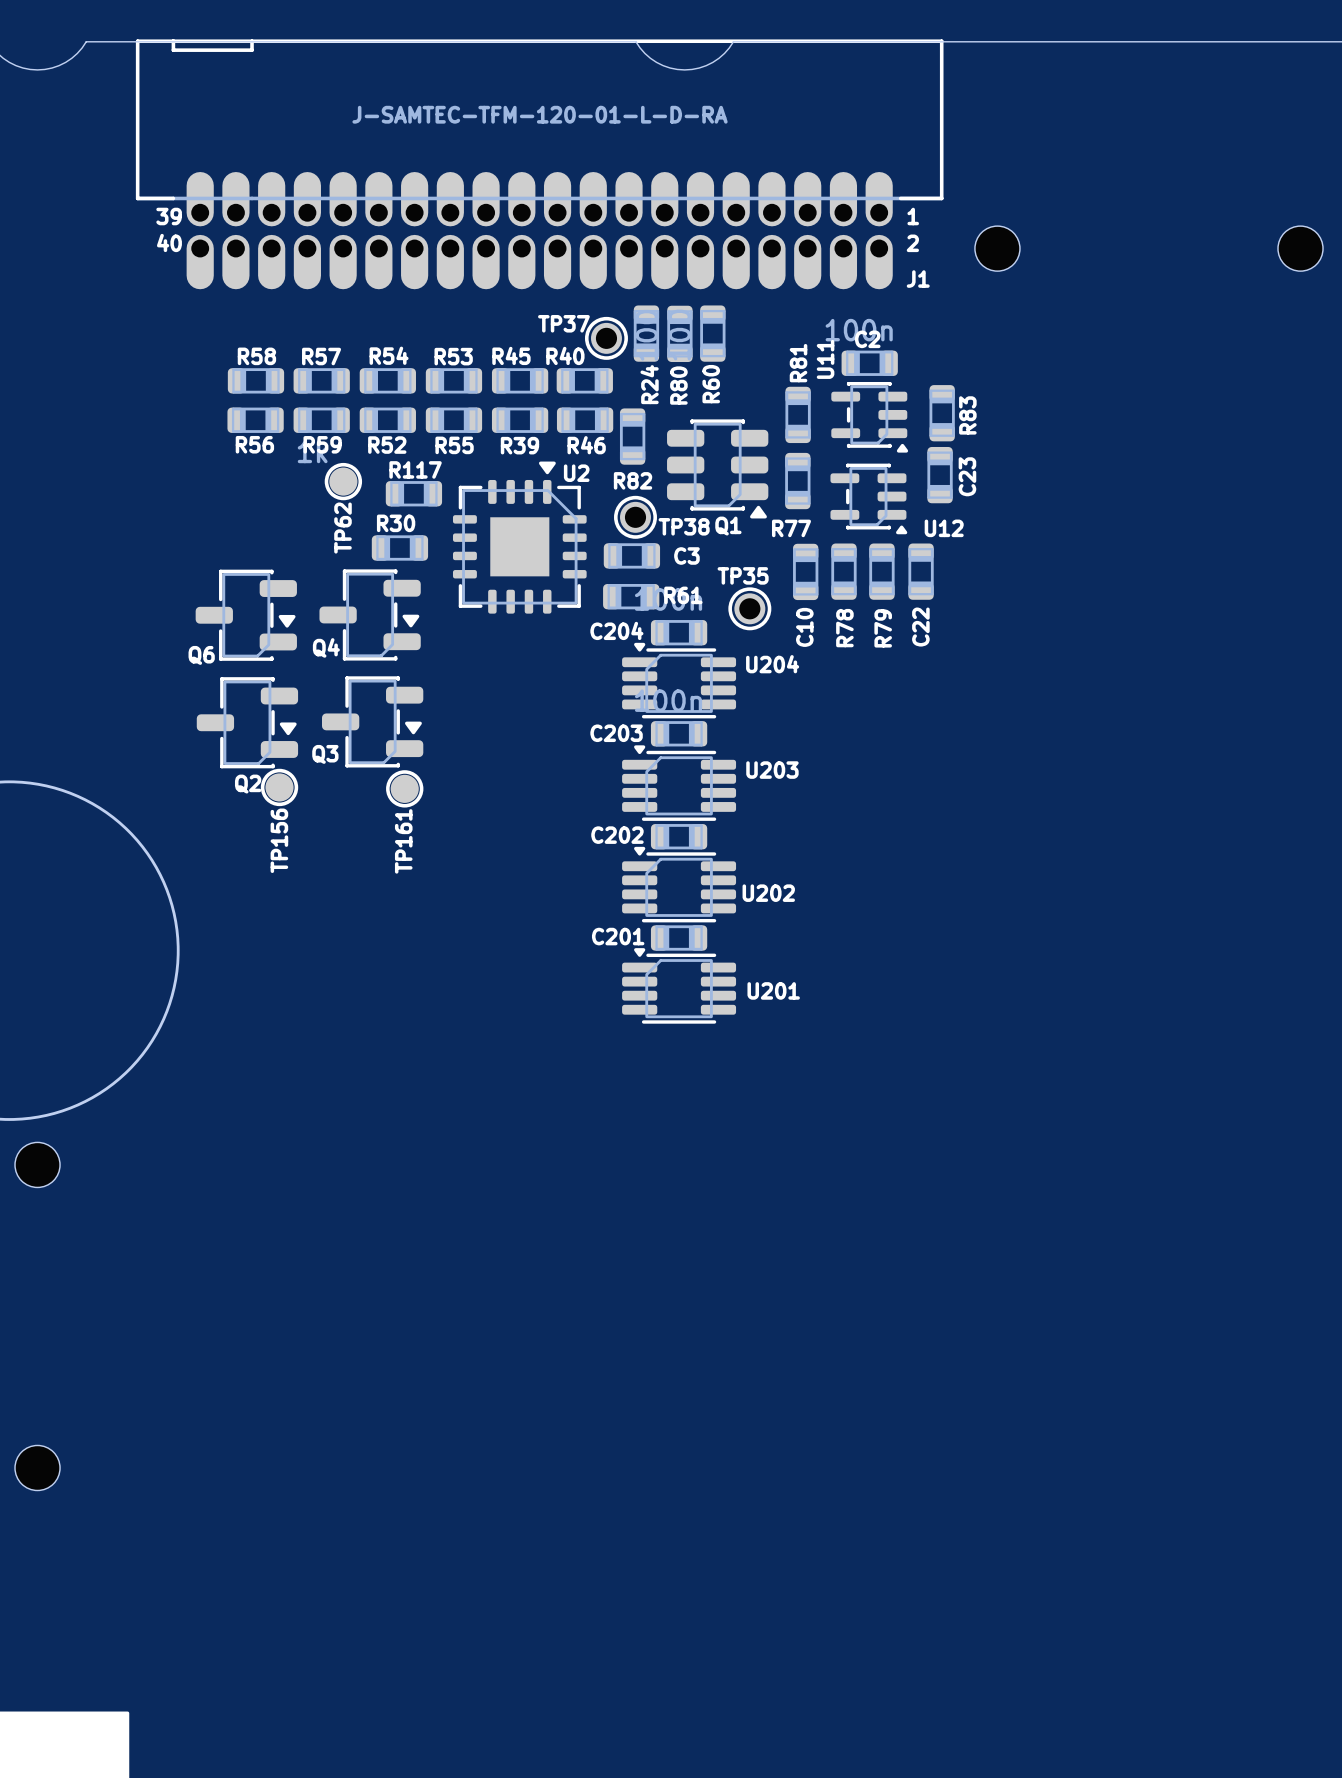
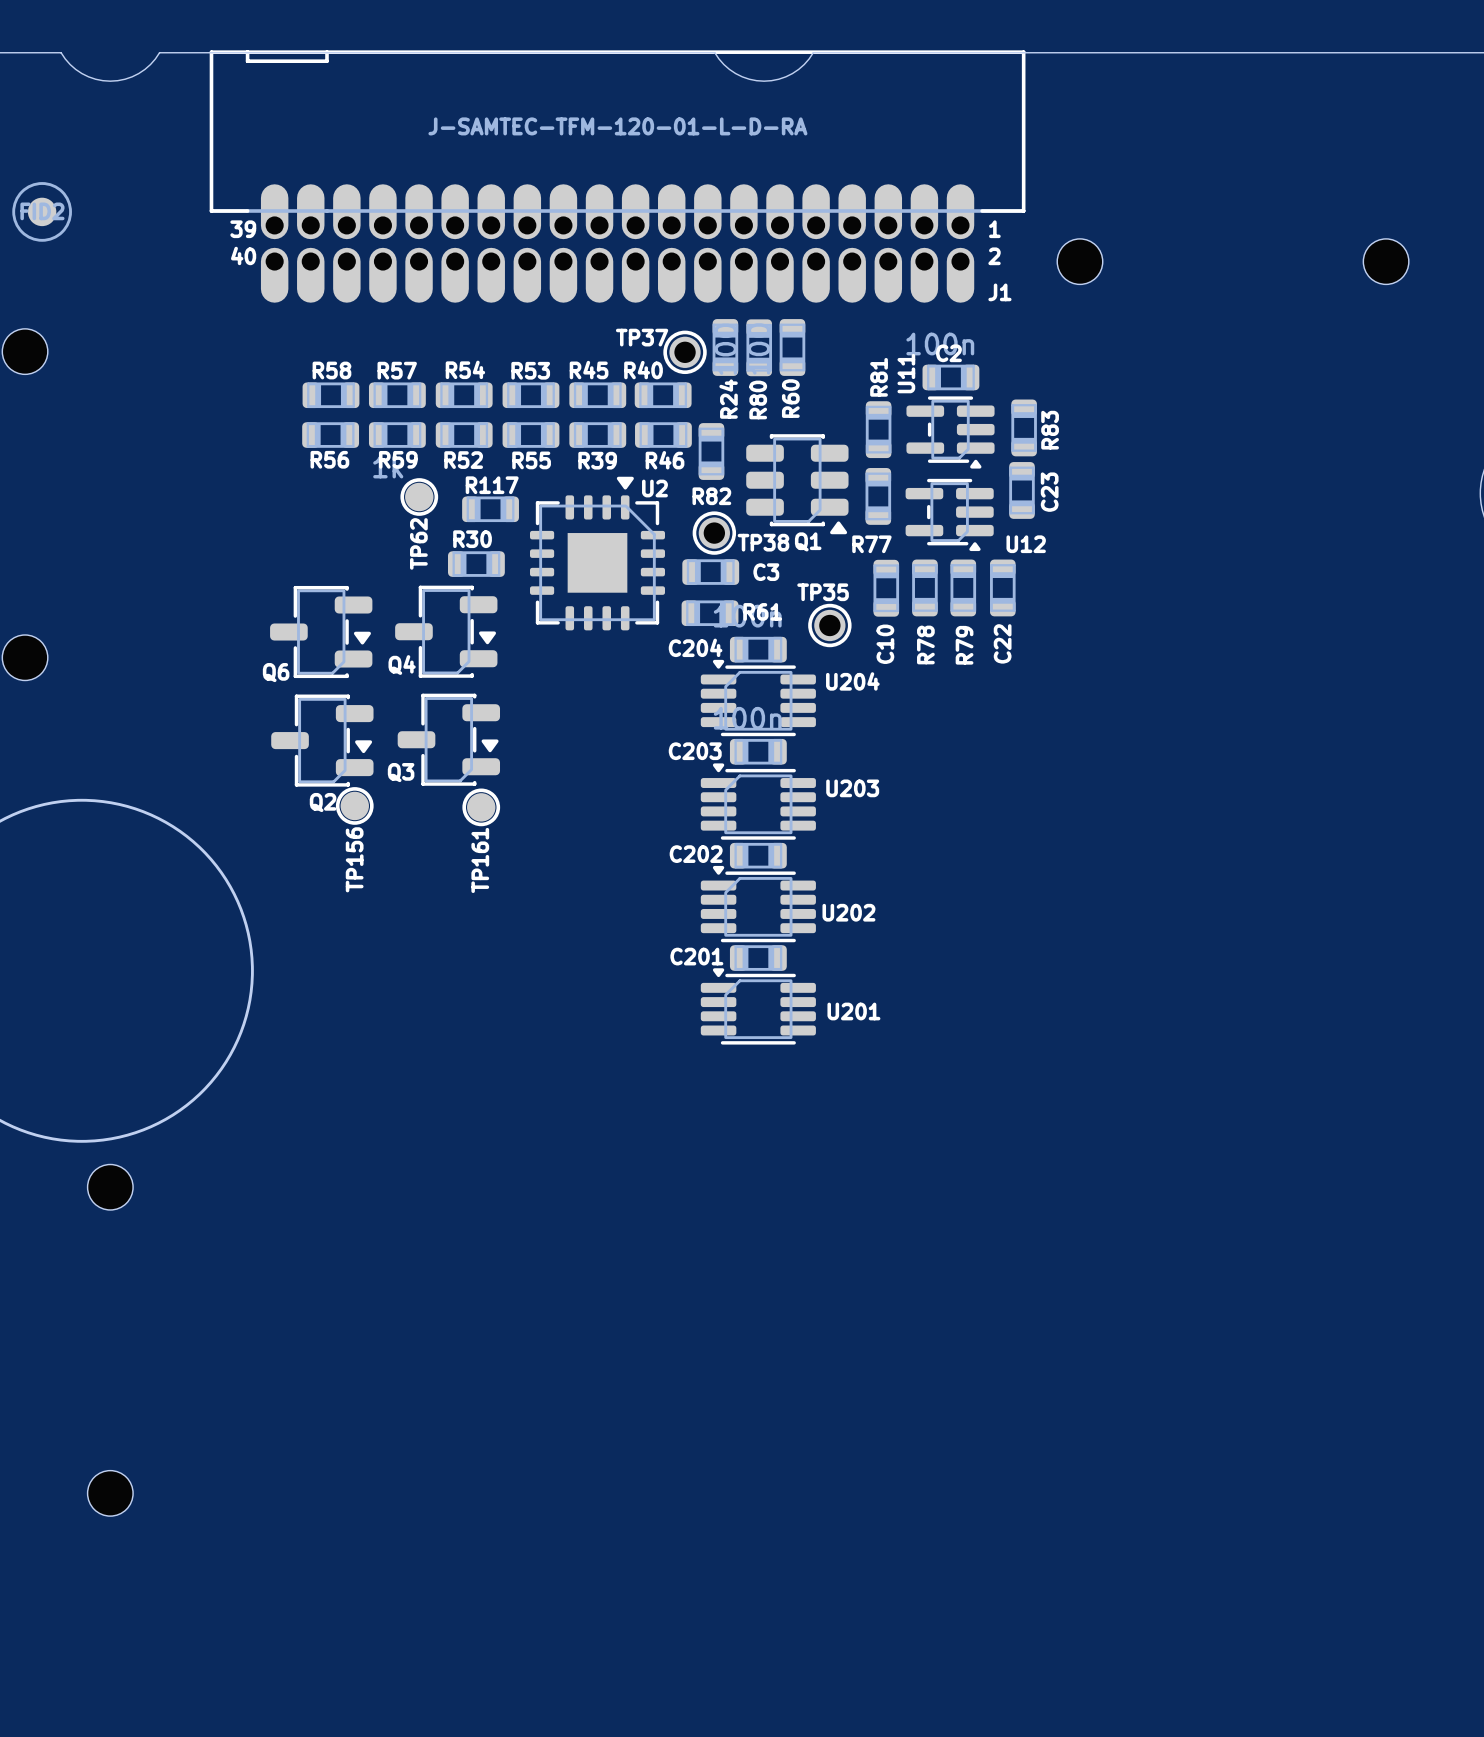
U11 footprint: [831, 381, 909, 453] -> [906, 396, 995, 469]
U12 footprint: [830, 463, 908, 535] -> [905, 478, 994, 552]

